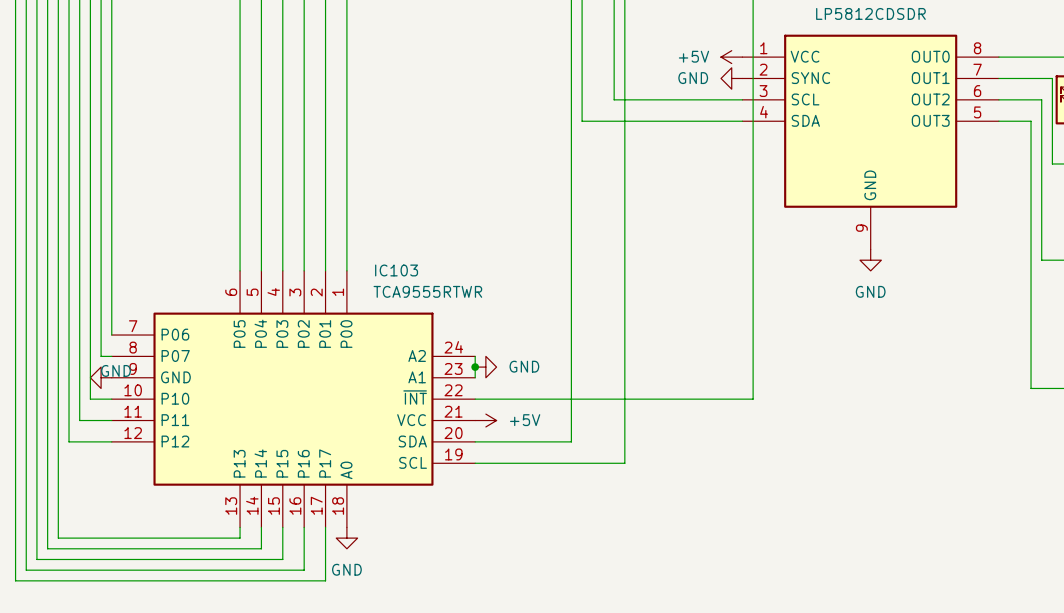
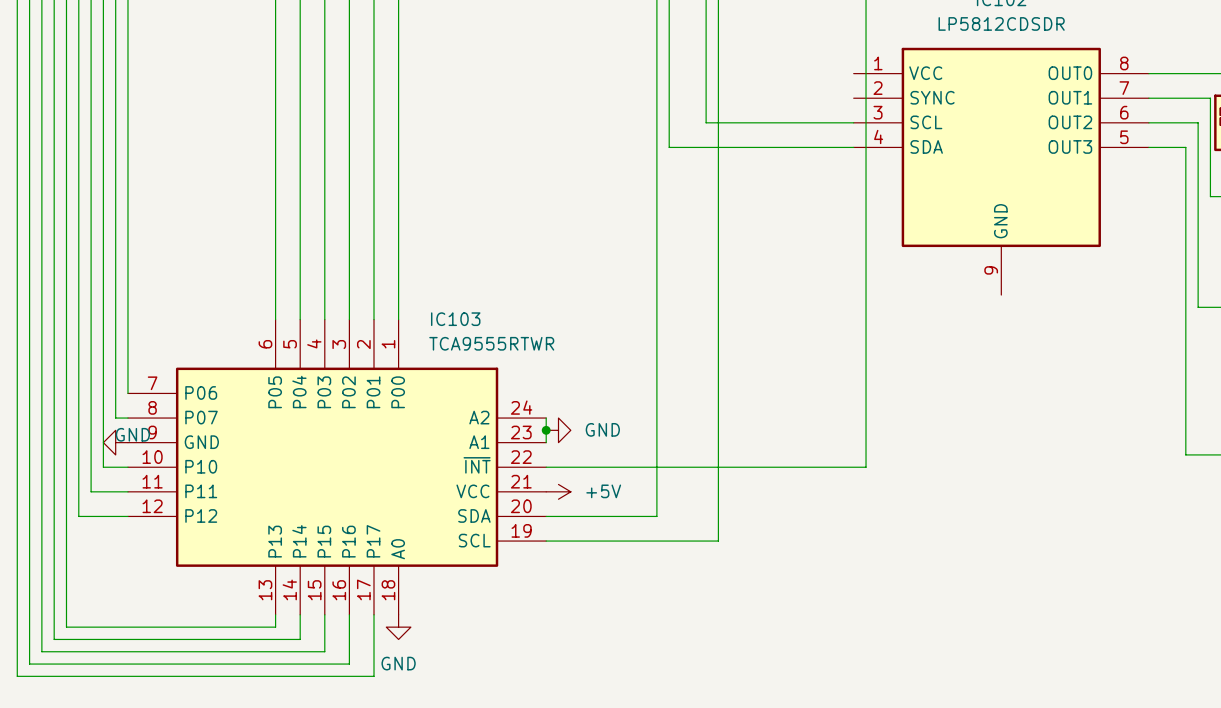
power symbol: +5V (731, 57) -> none
power symbol: GND (731, 78) -> none
power symbol: GND (870, 260) -> none

